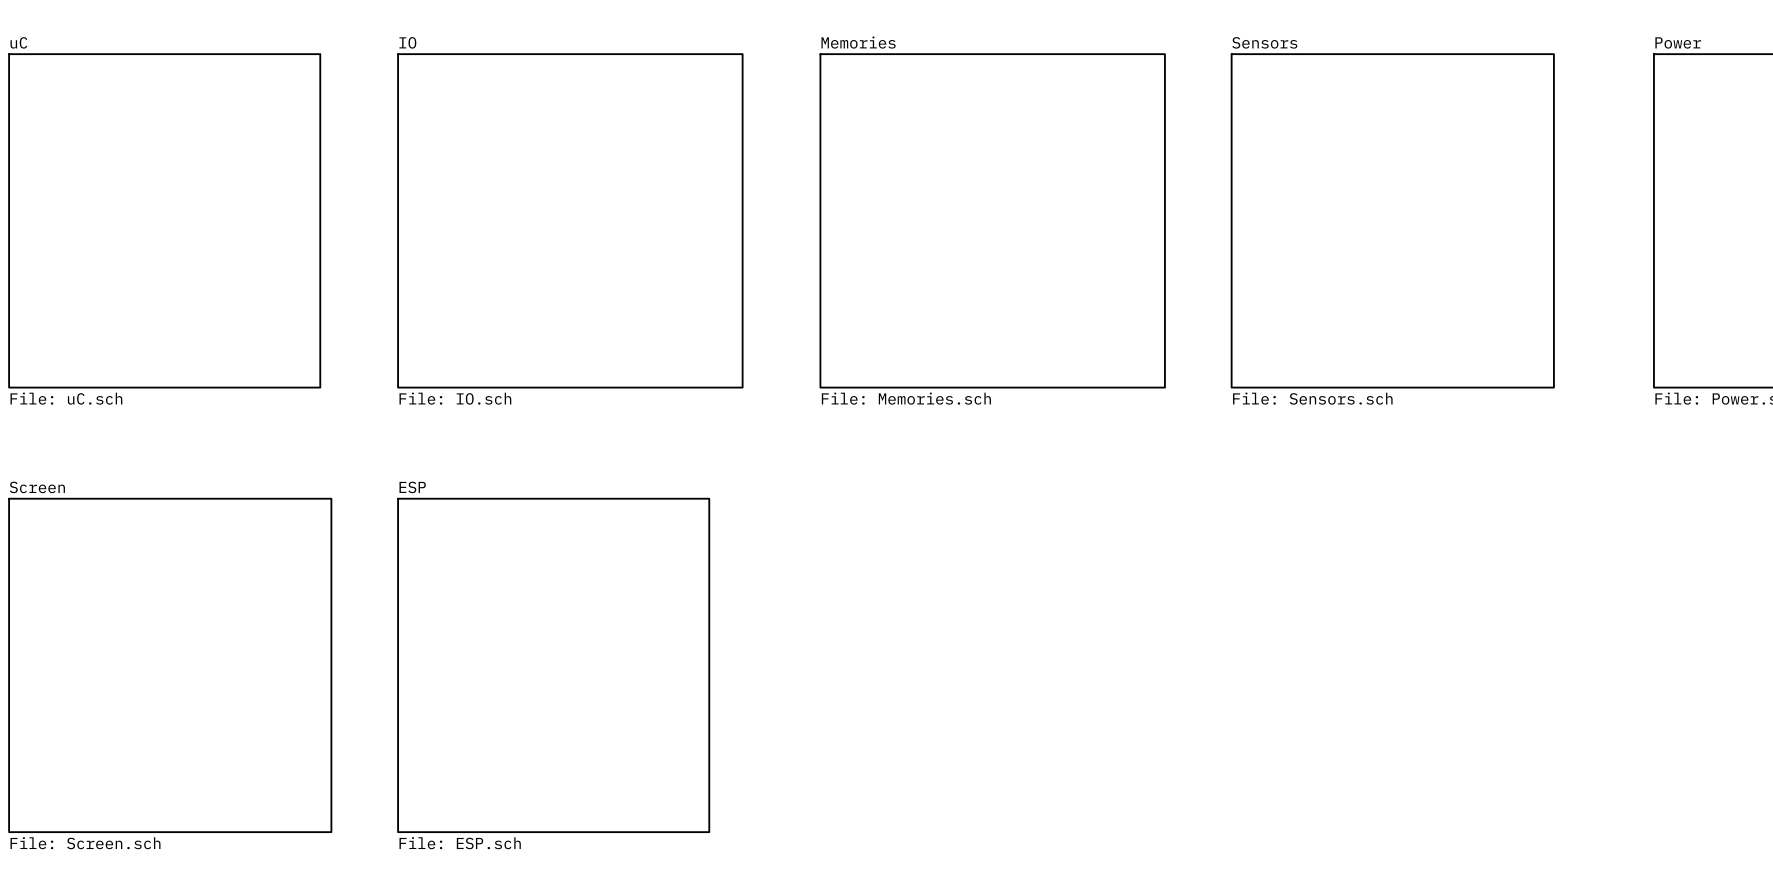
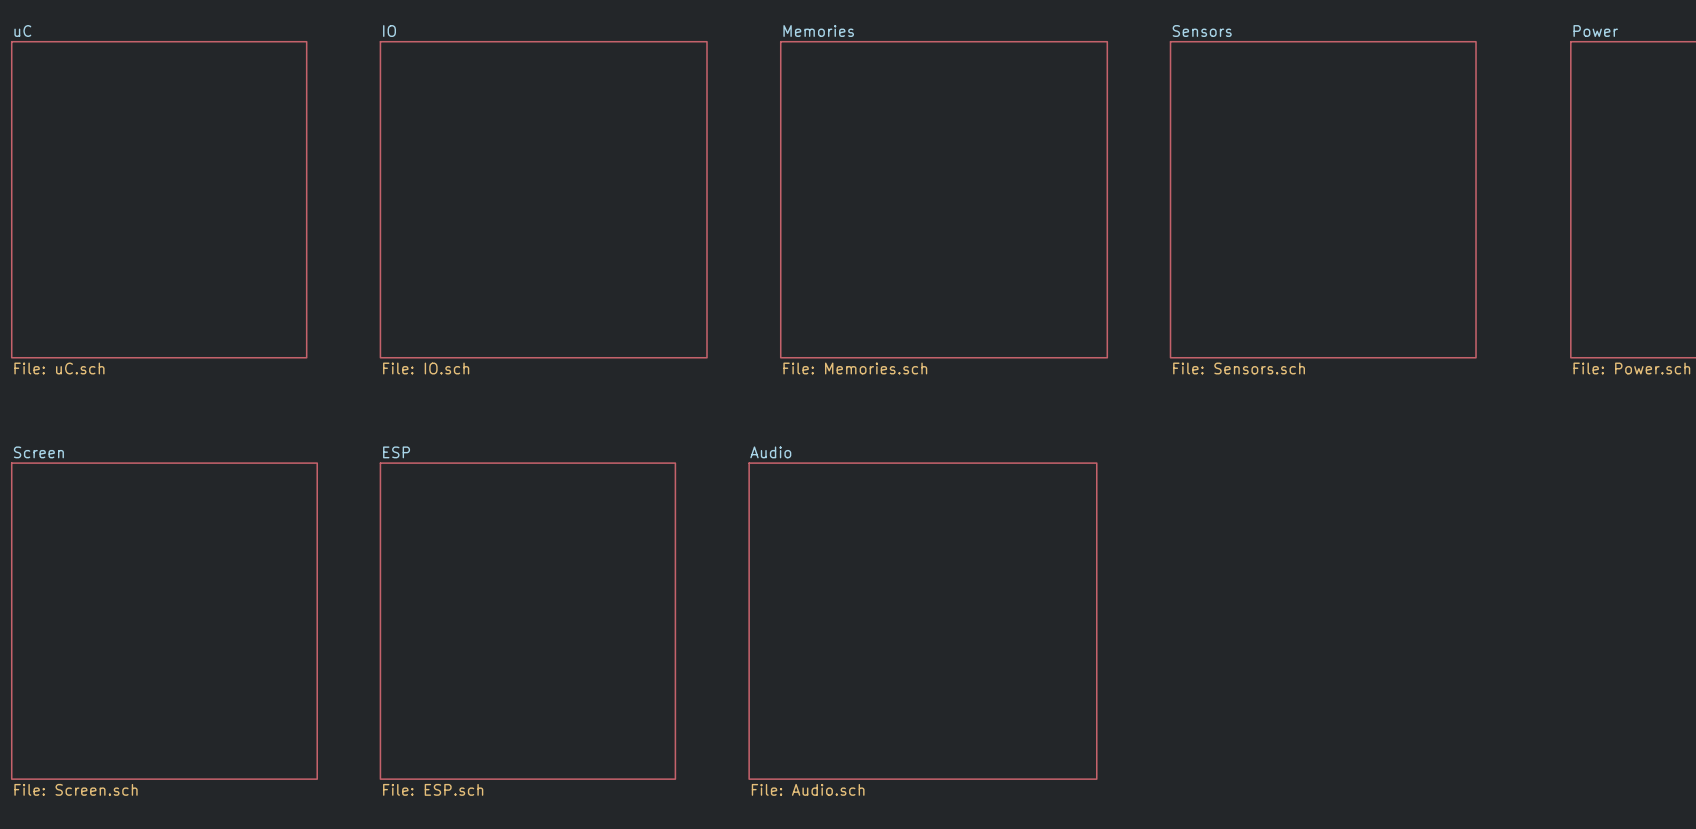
sheet Audio: none -> File: Audio.sch (922, 621)

